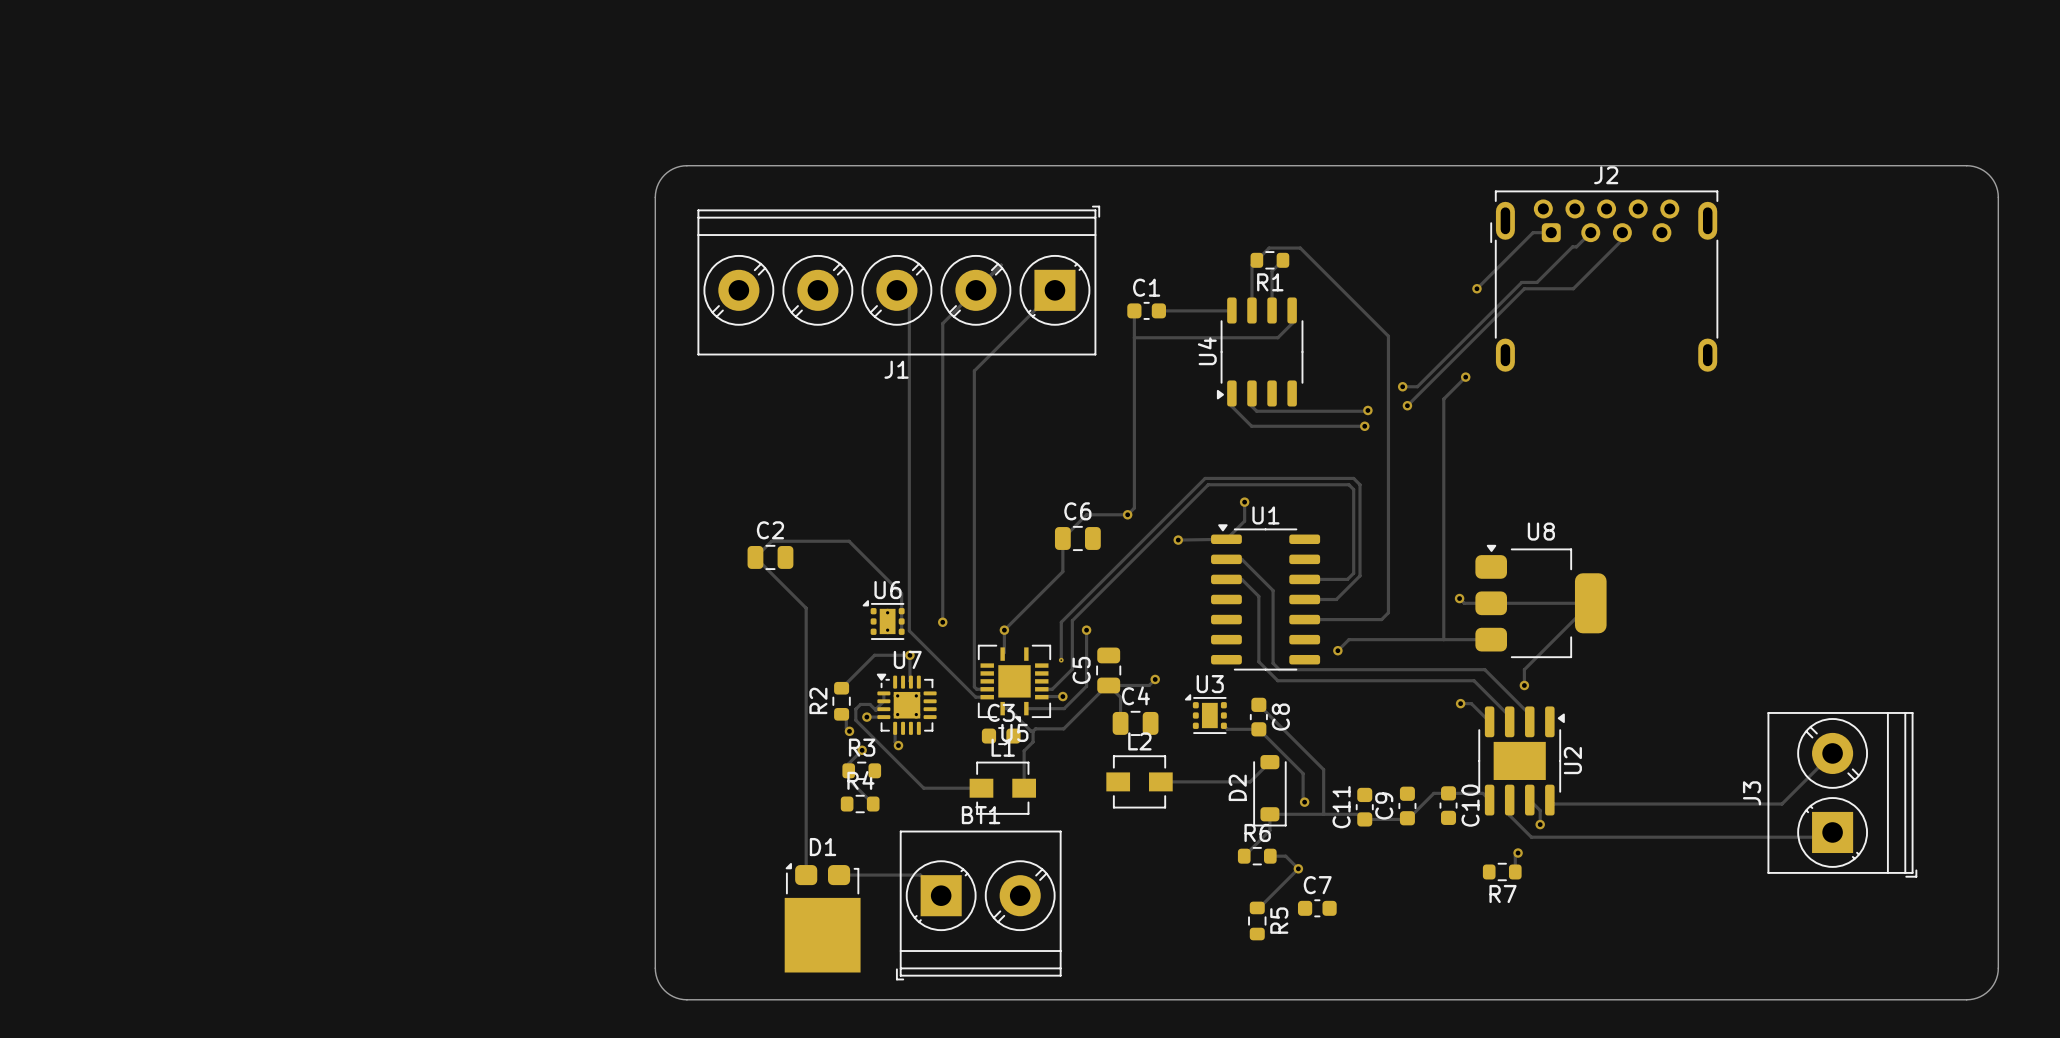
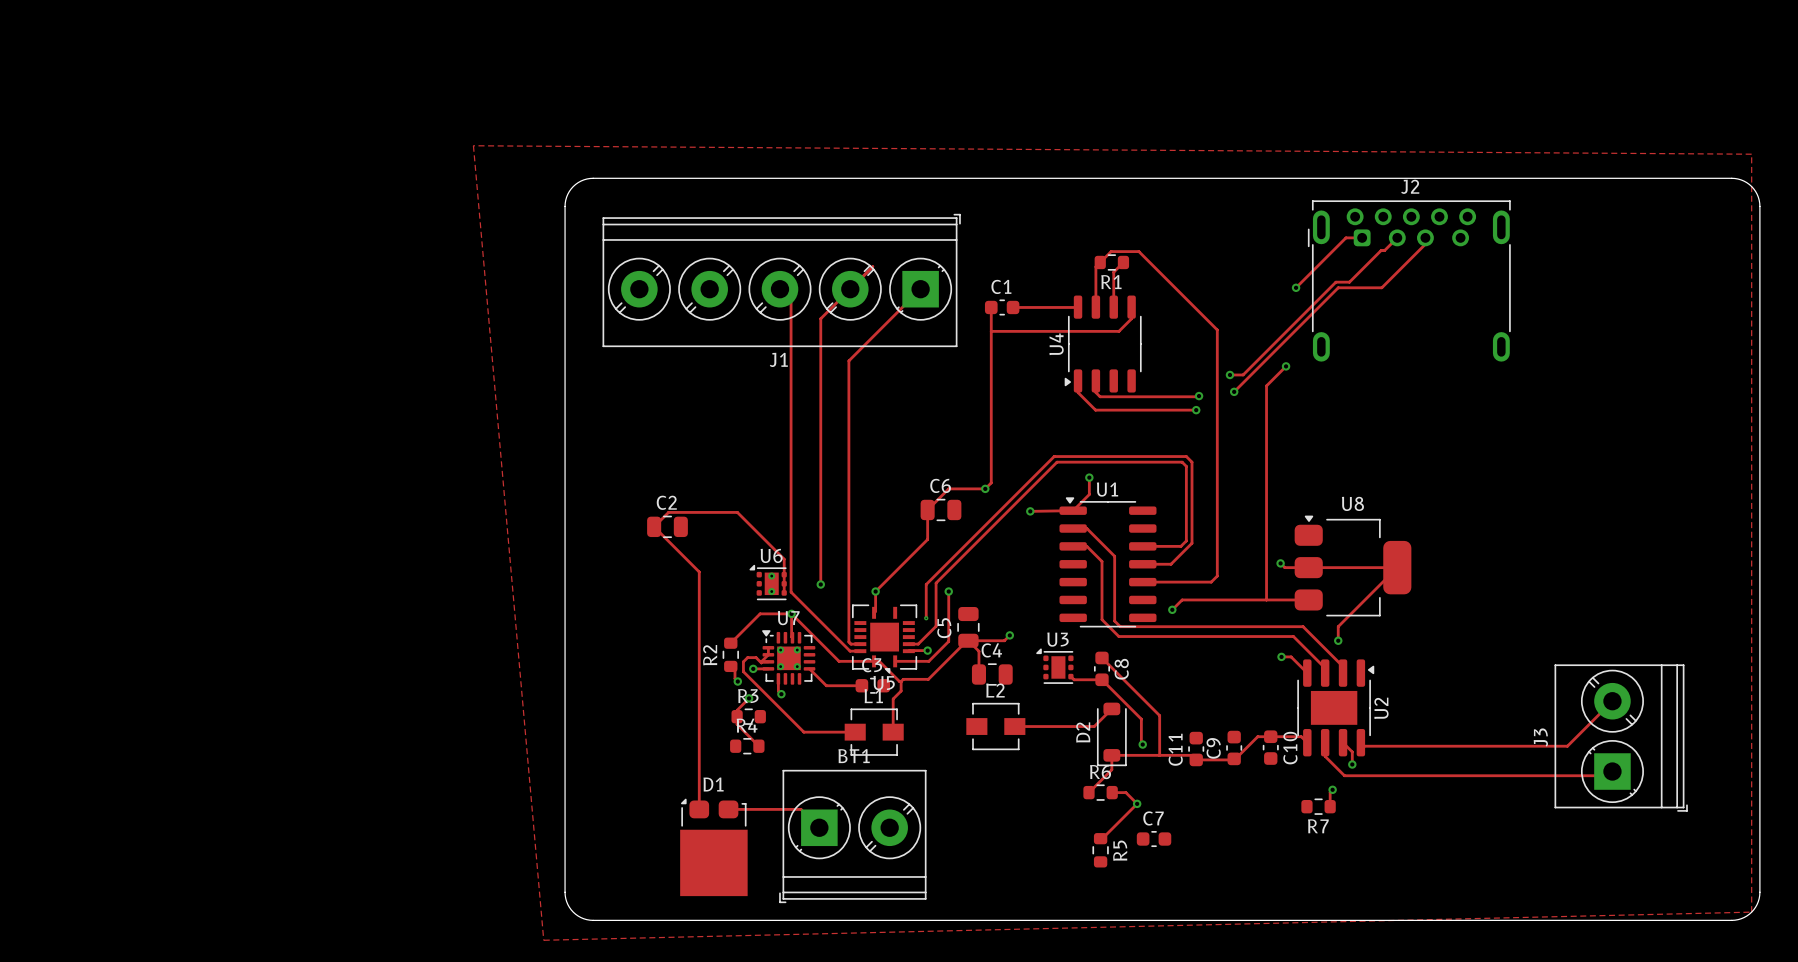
zone outline: none -> (473, 145) (1751, 154) (1751, 912) (543, 940) (473, 145)
track: none -> (791, 613) (839, 661) (874, 661)
track: none -> (809, 668) (826, 685) (861, 685)

